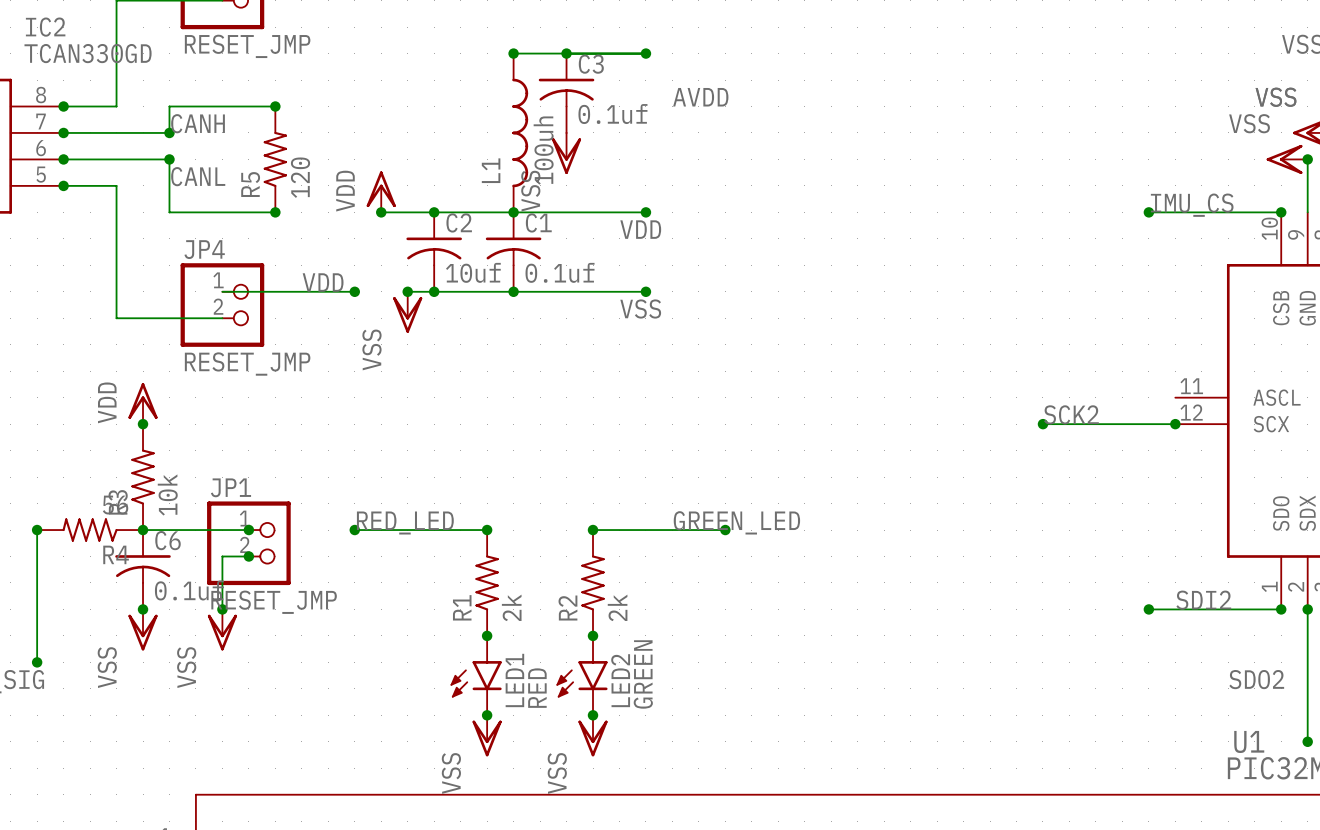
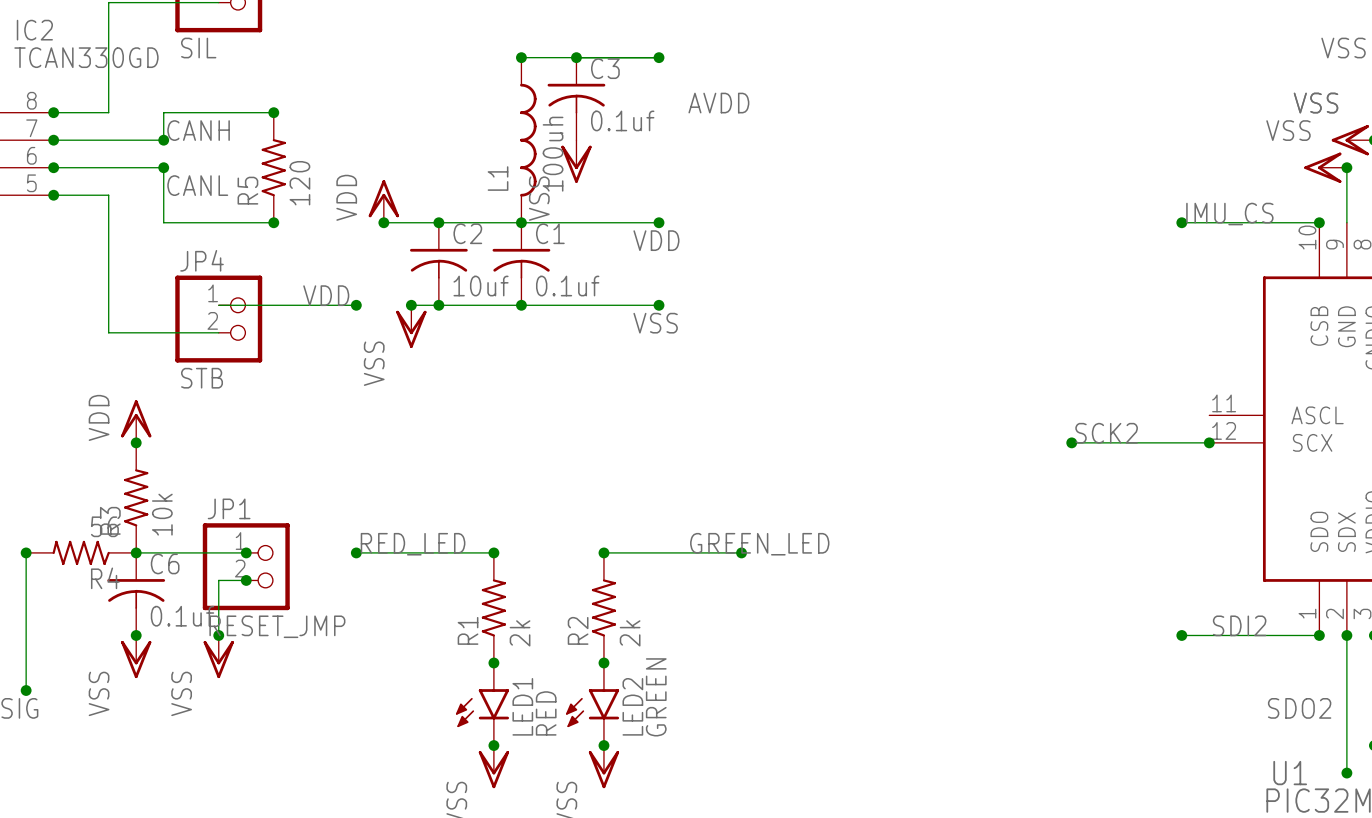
part value: RESET_JMP (247, 46) -> SIL (198, 48)
JP4 value: RESET_JMP (247, 364) -> STB (202, 378)

